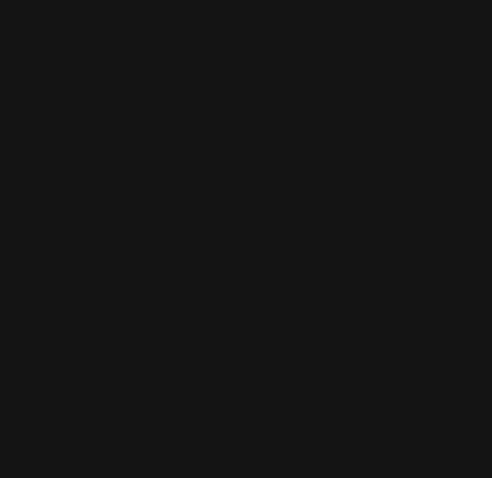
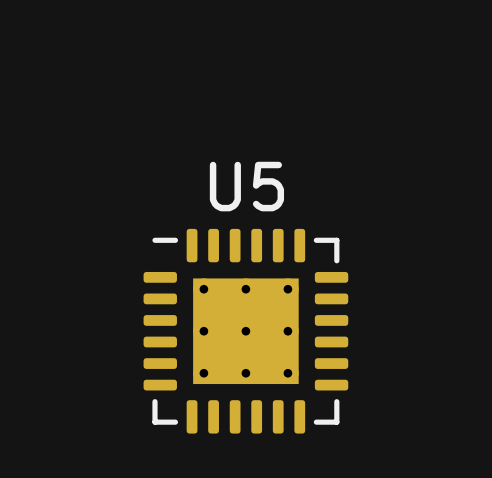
U5: none -> (245, 331)

